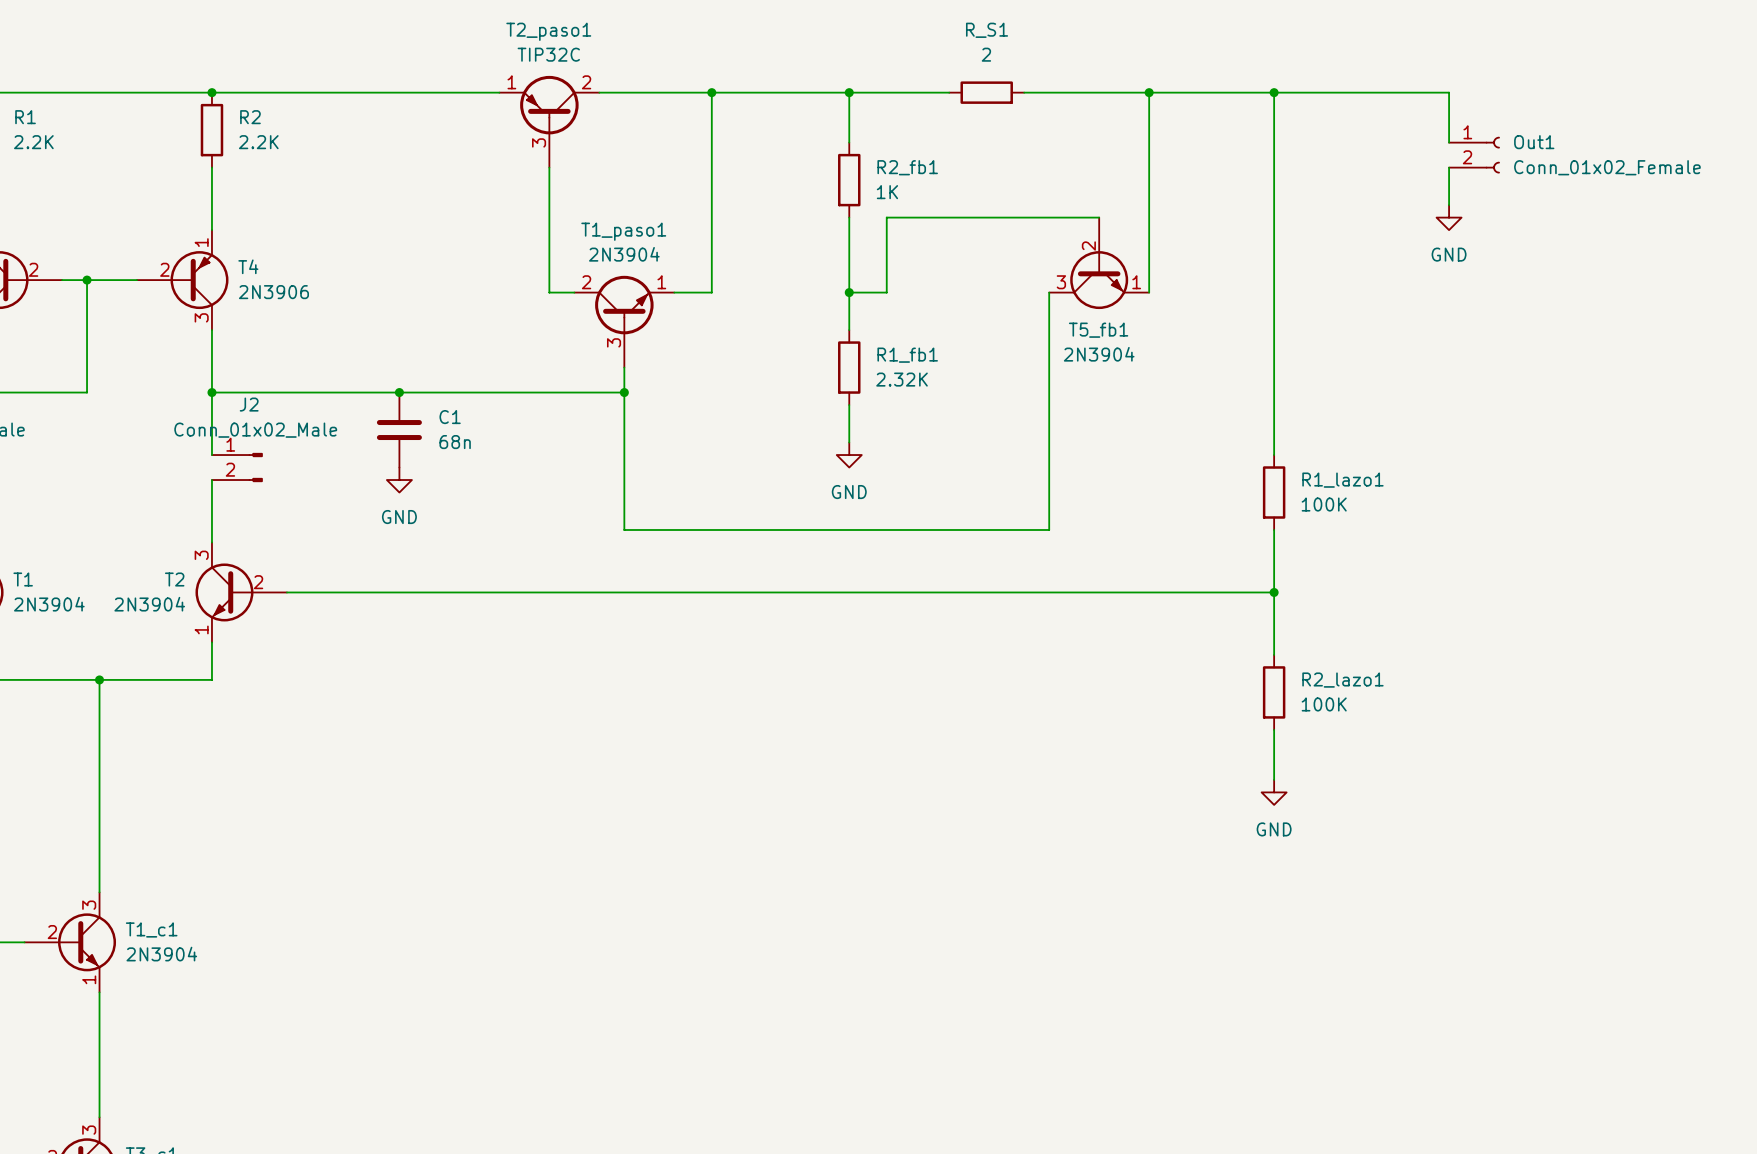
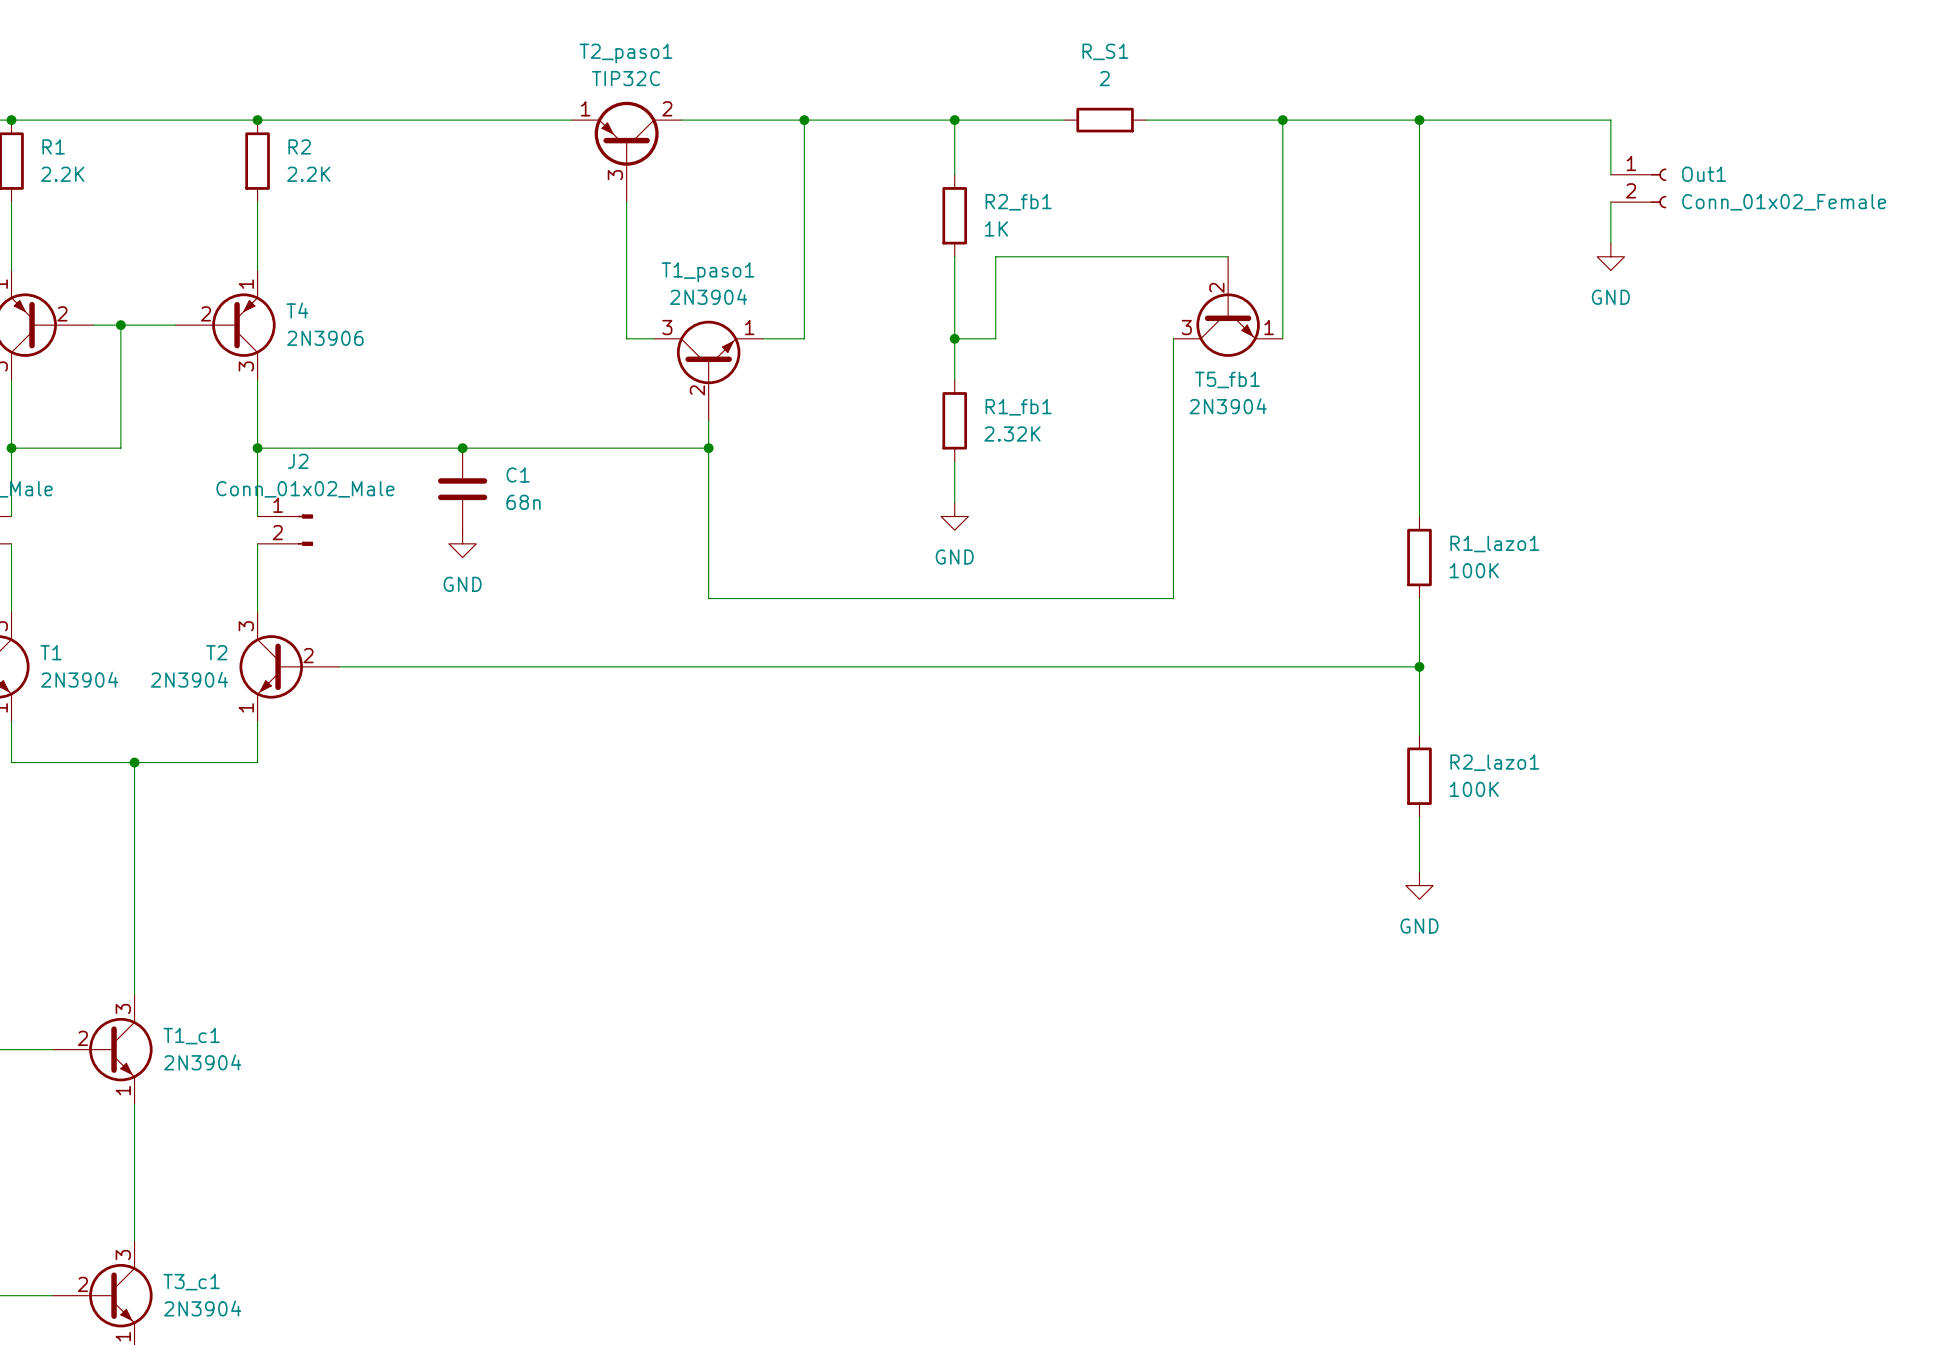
T1_paso1 symbol: [574, 275, 675, 368] -> [653, 320, 764, 421]

